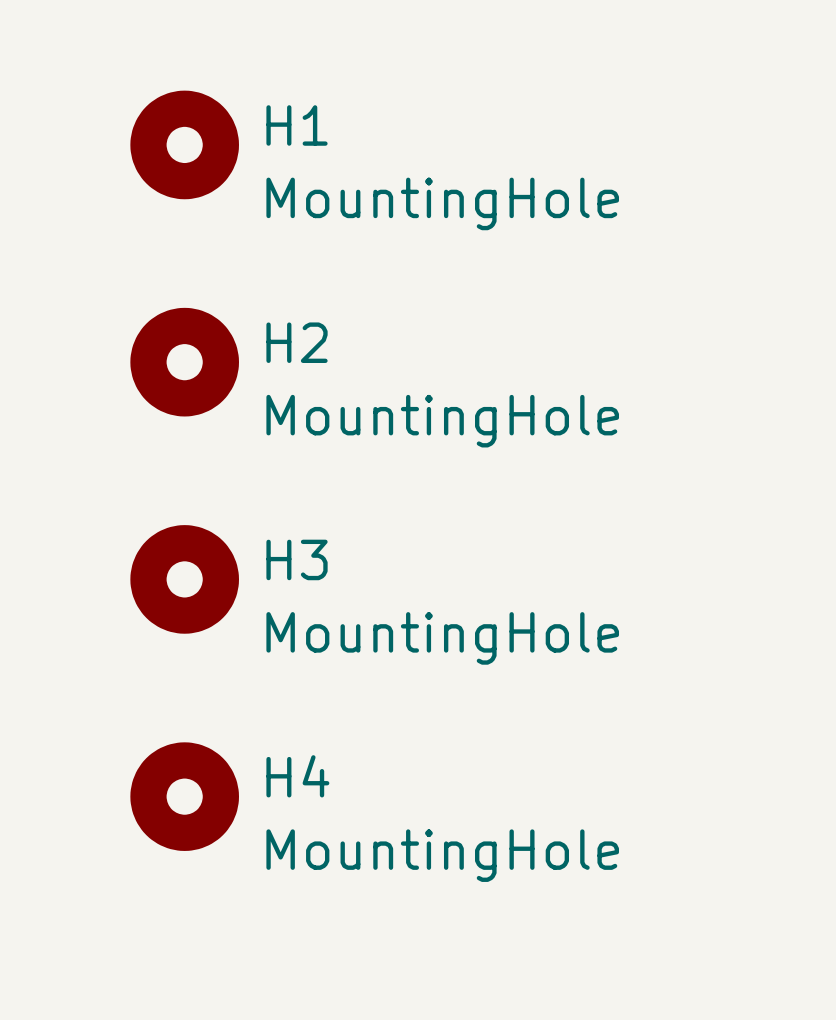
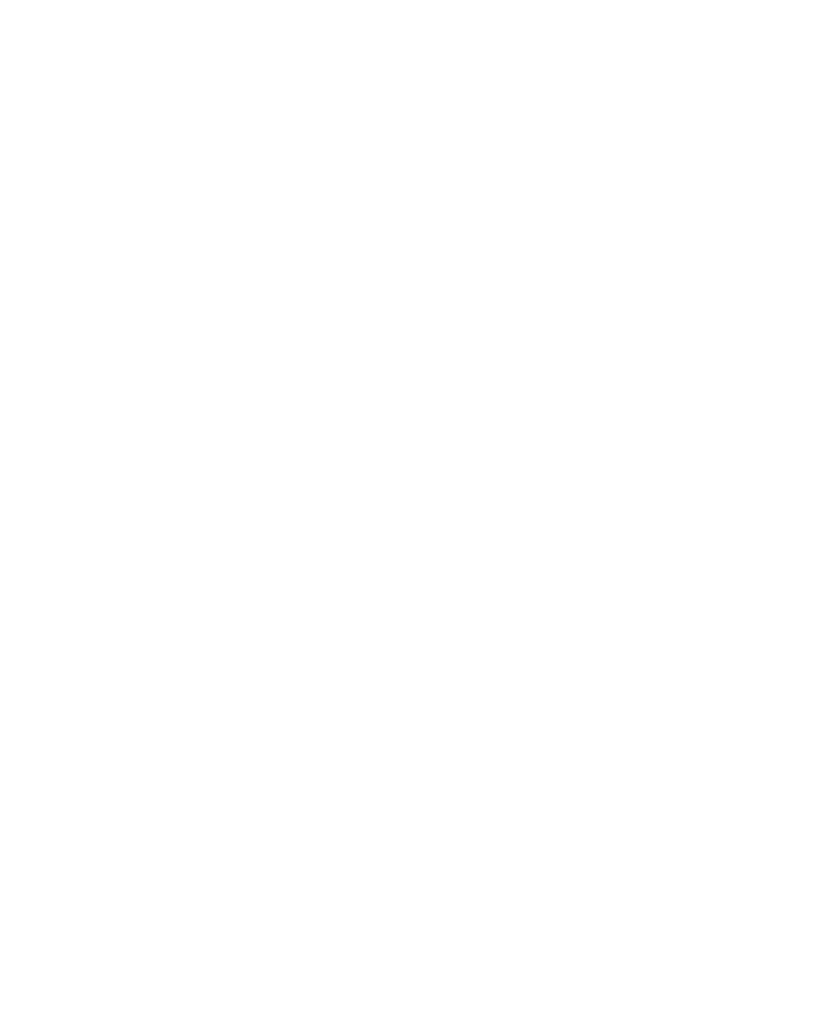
H1: MountingHole (184, 144) -> none
H2: MountingHole (184, 362) -> none
H3: MountingHole (184, 579) -> none
H4: MountingHole (184, 796) -> none

